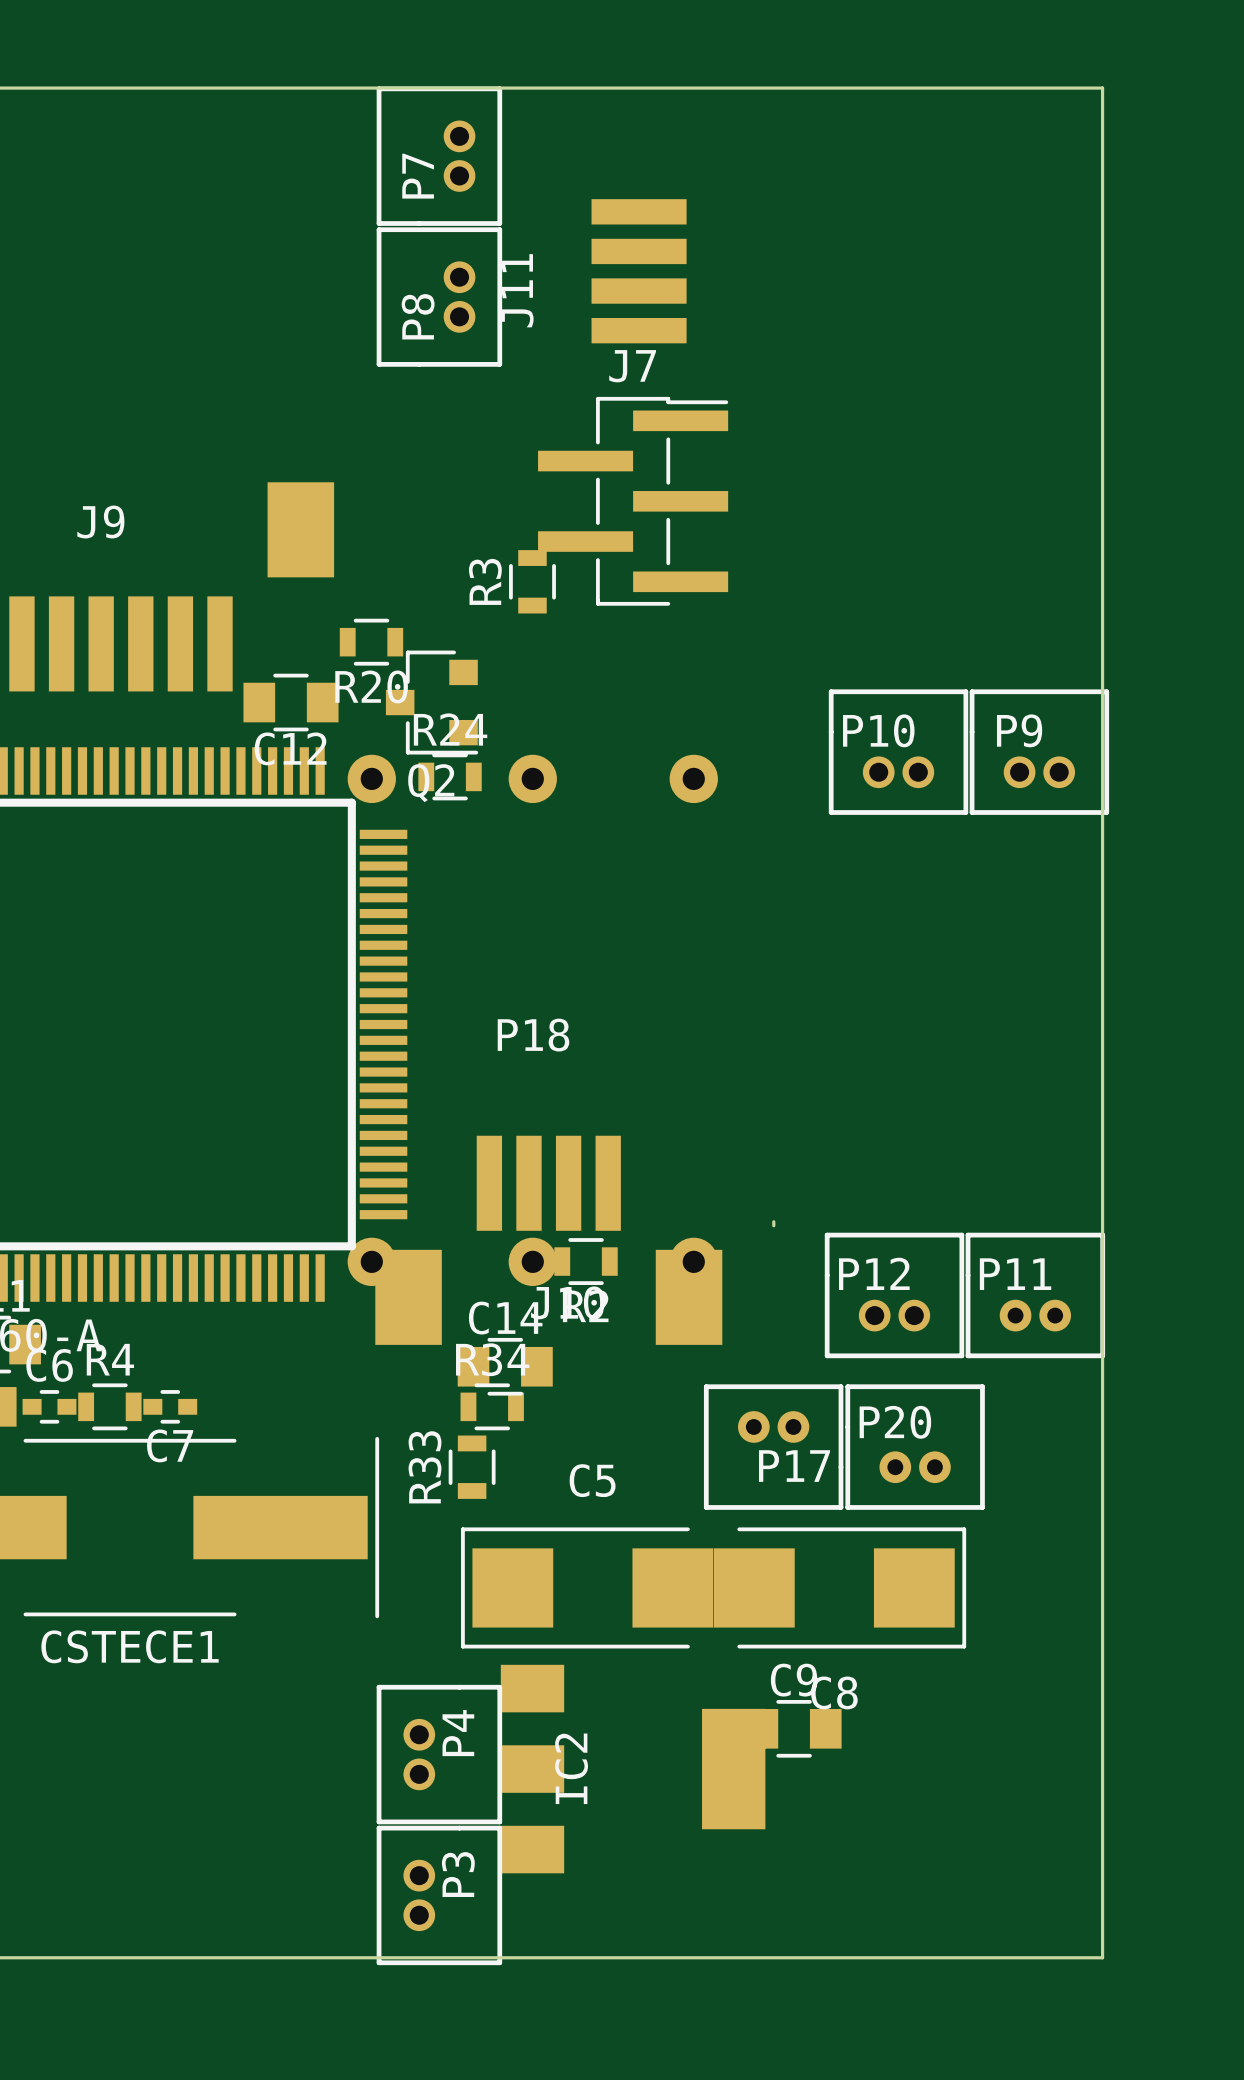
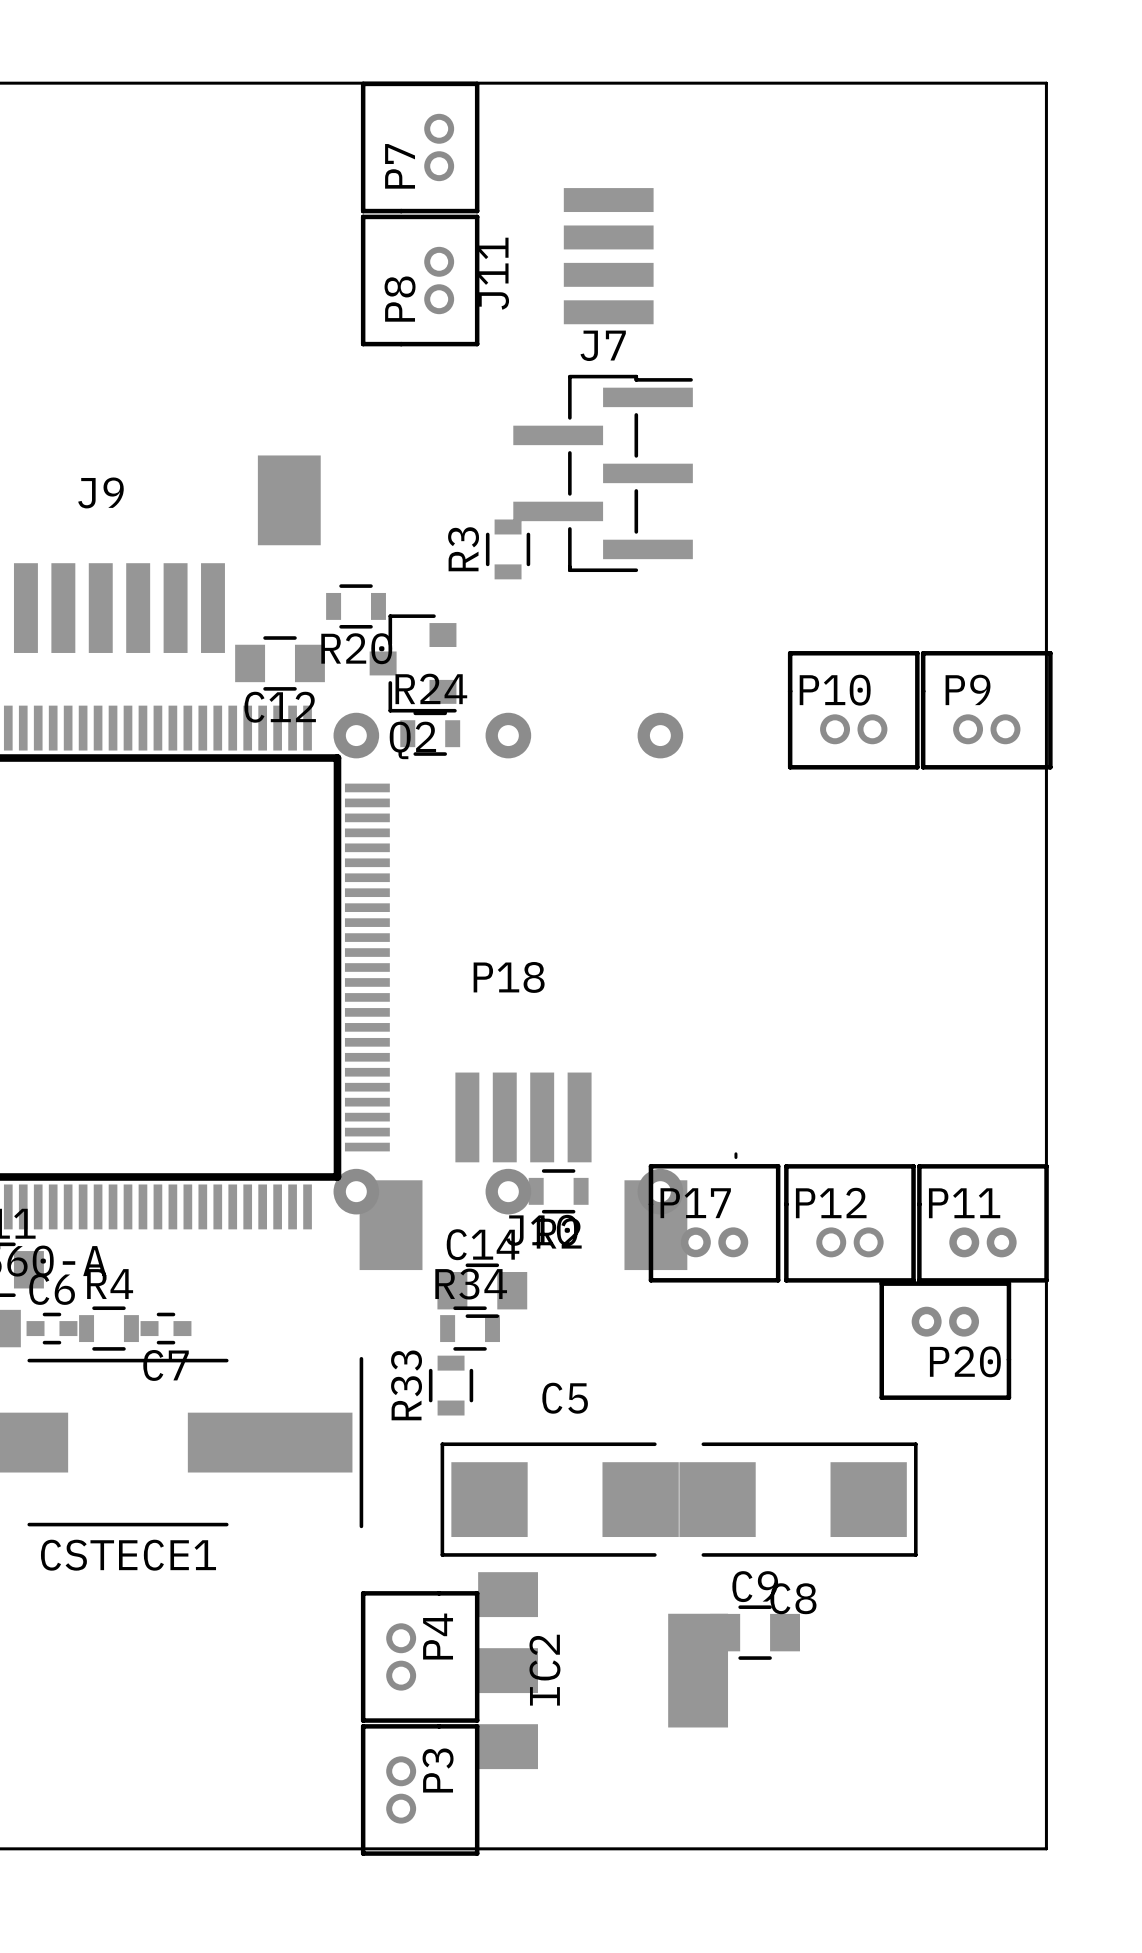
P17 rotation: 0° (773, 1447) -> 180° (714, 1223)
P17 position: (773, 1447) -> (714, 1223)
P20 rotation: 0° (915, 1447) -> 180° (945, 1340)
P20 position: (915, 1447) -> (945, 1340)

